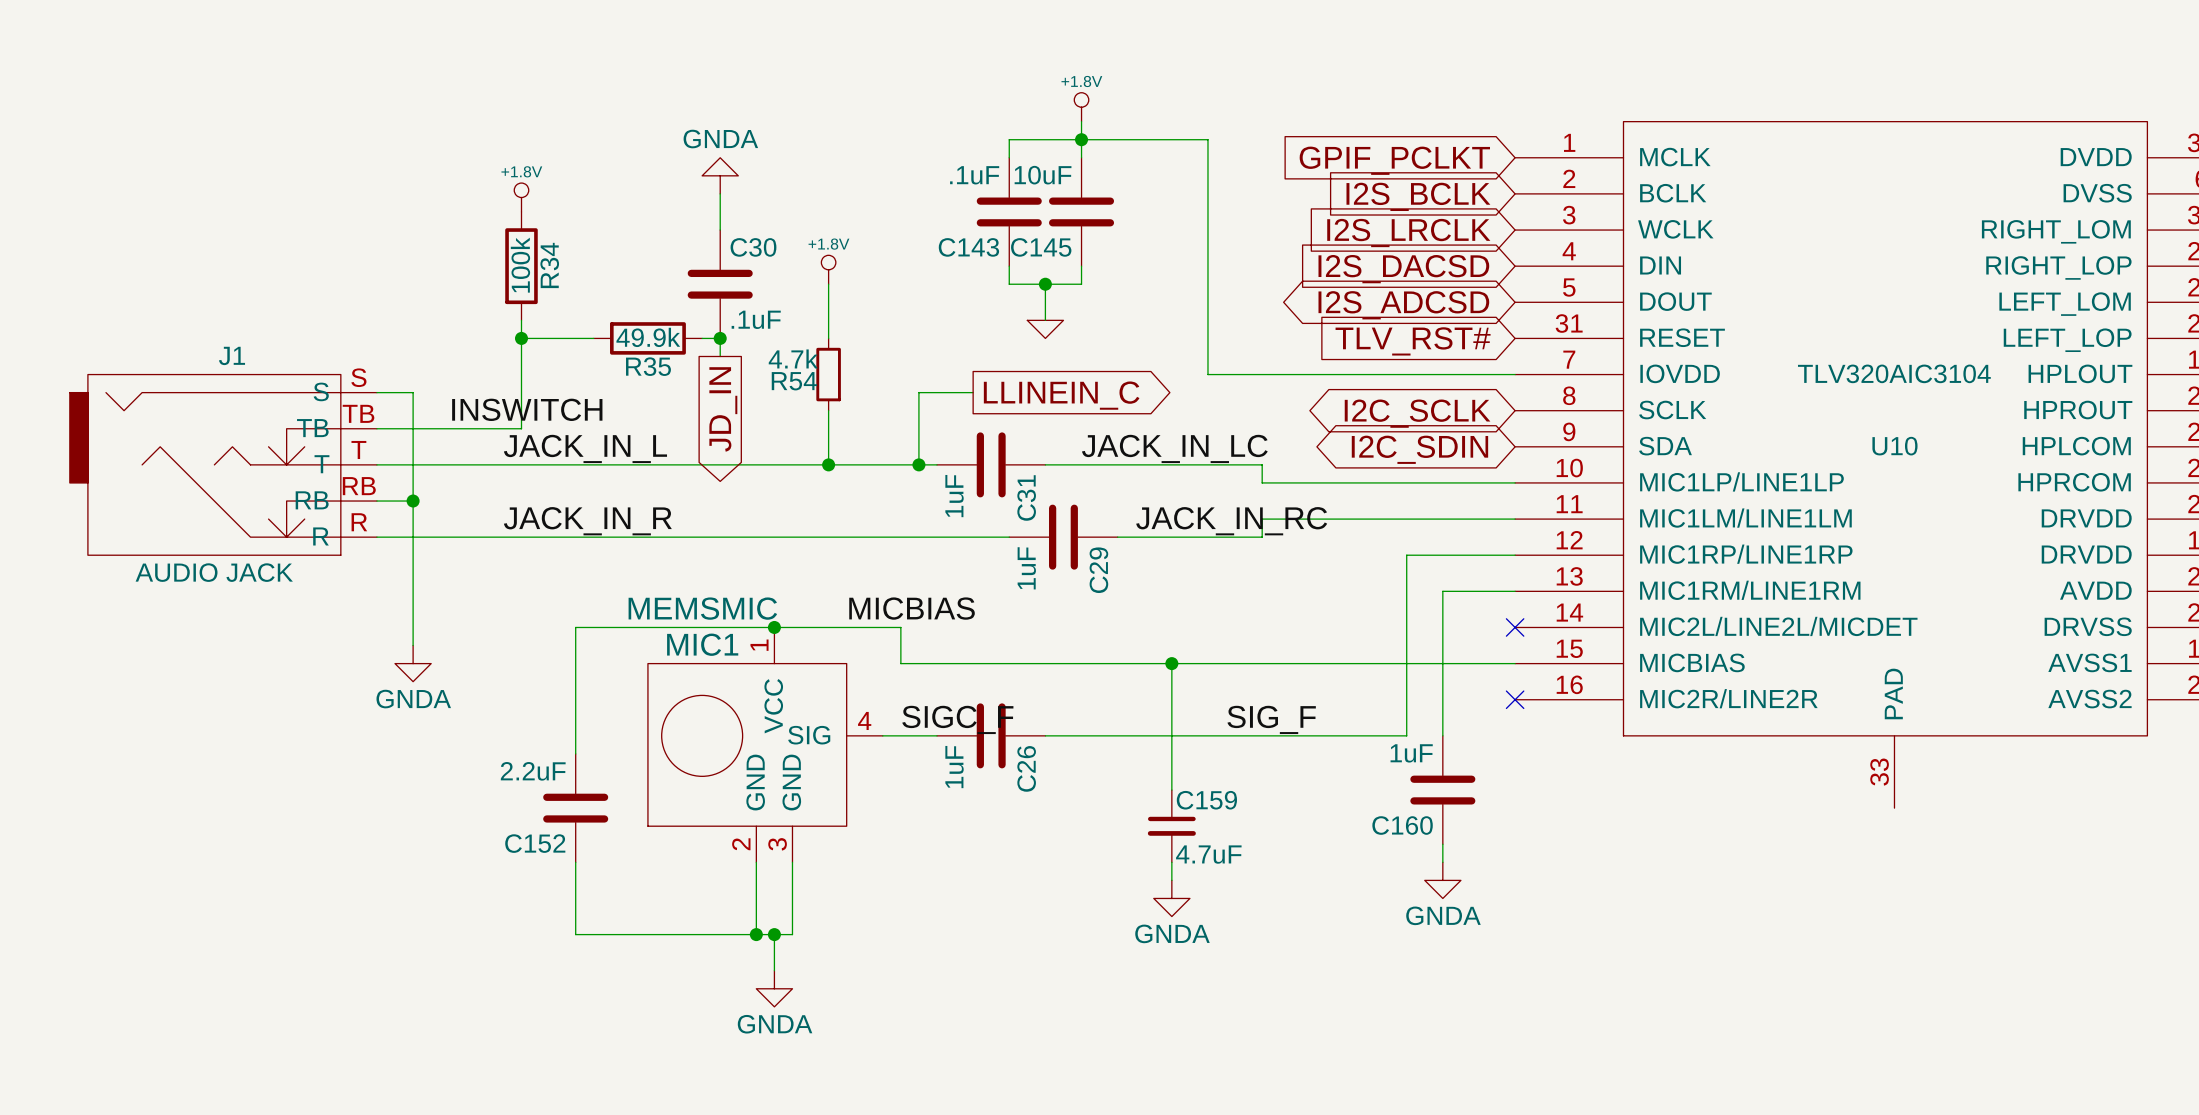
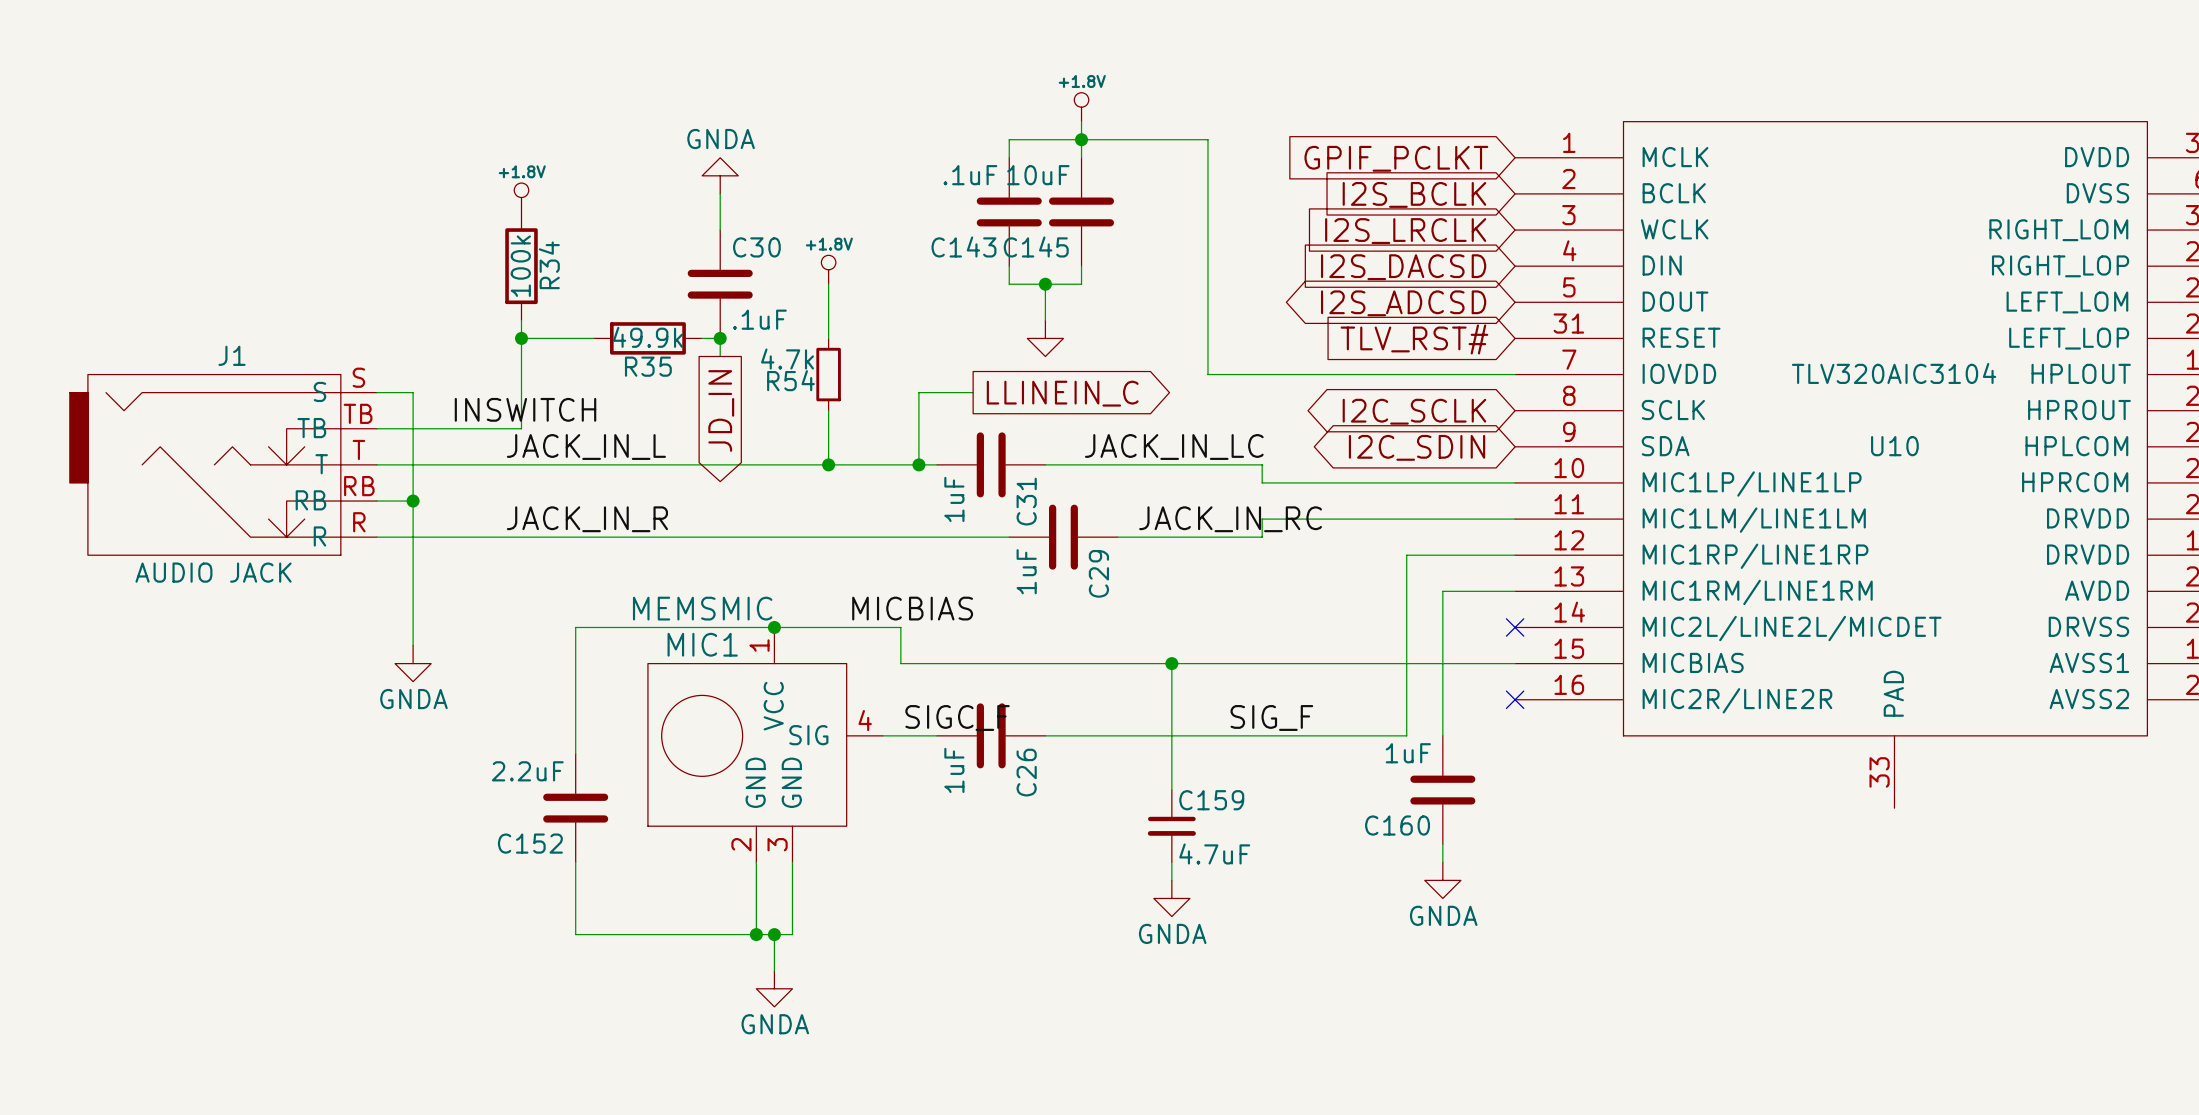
power symbol shape: [1027, 320, 1064, 339] -> [1027, 320, 1064, 357]

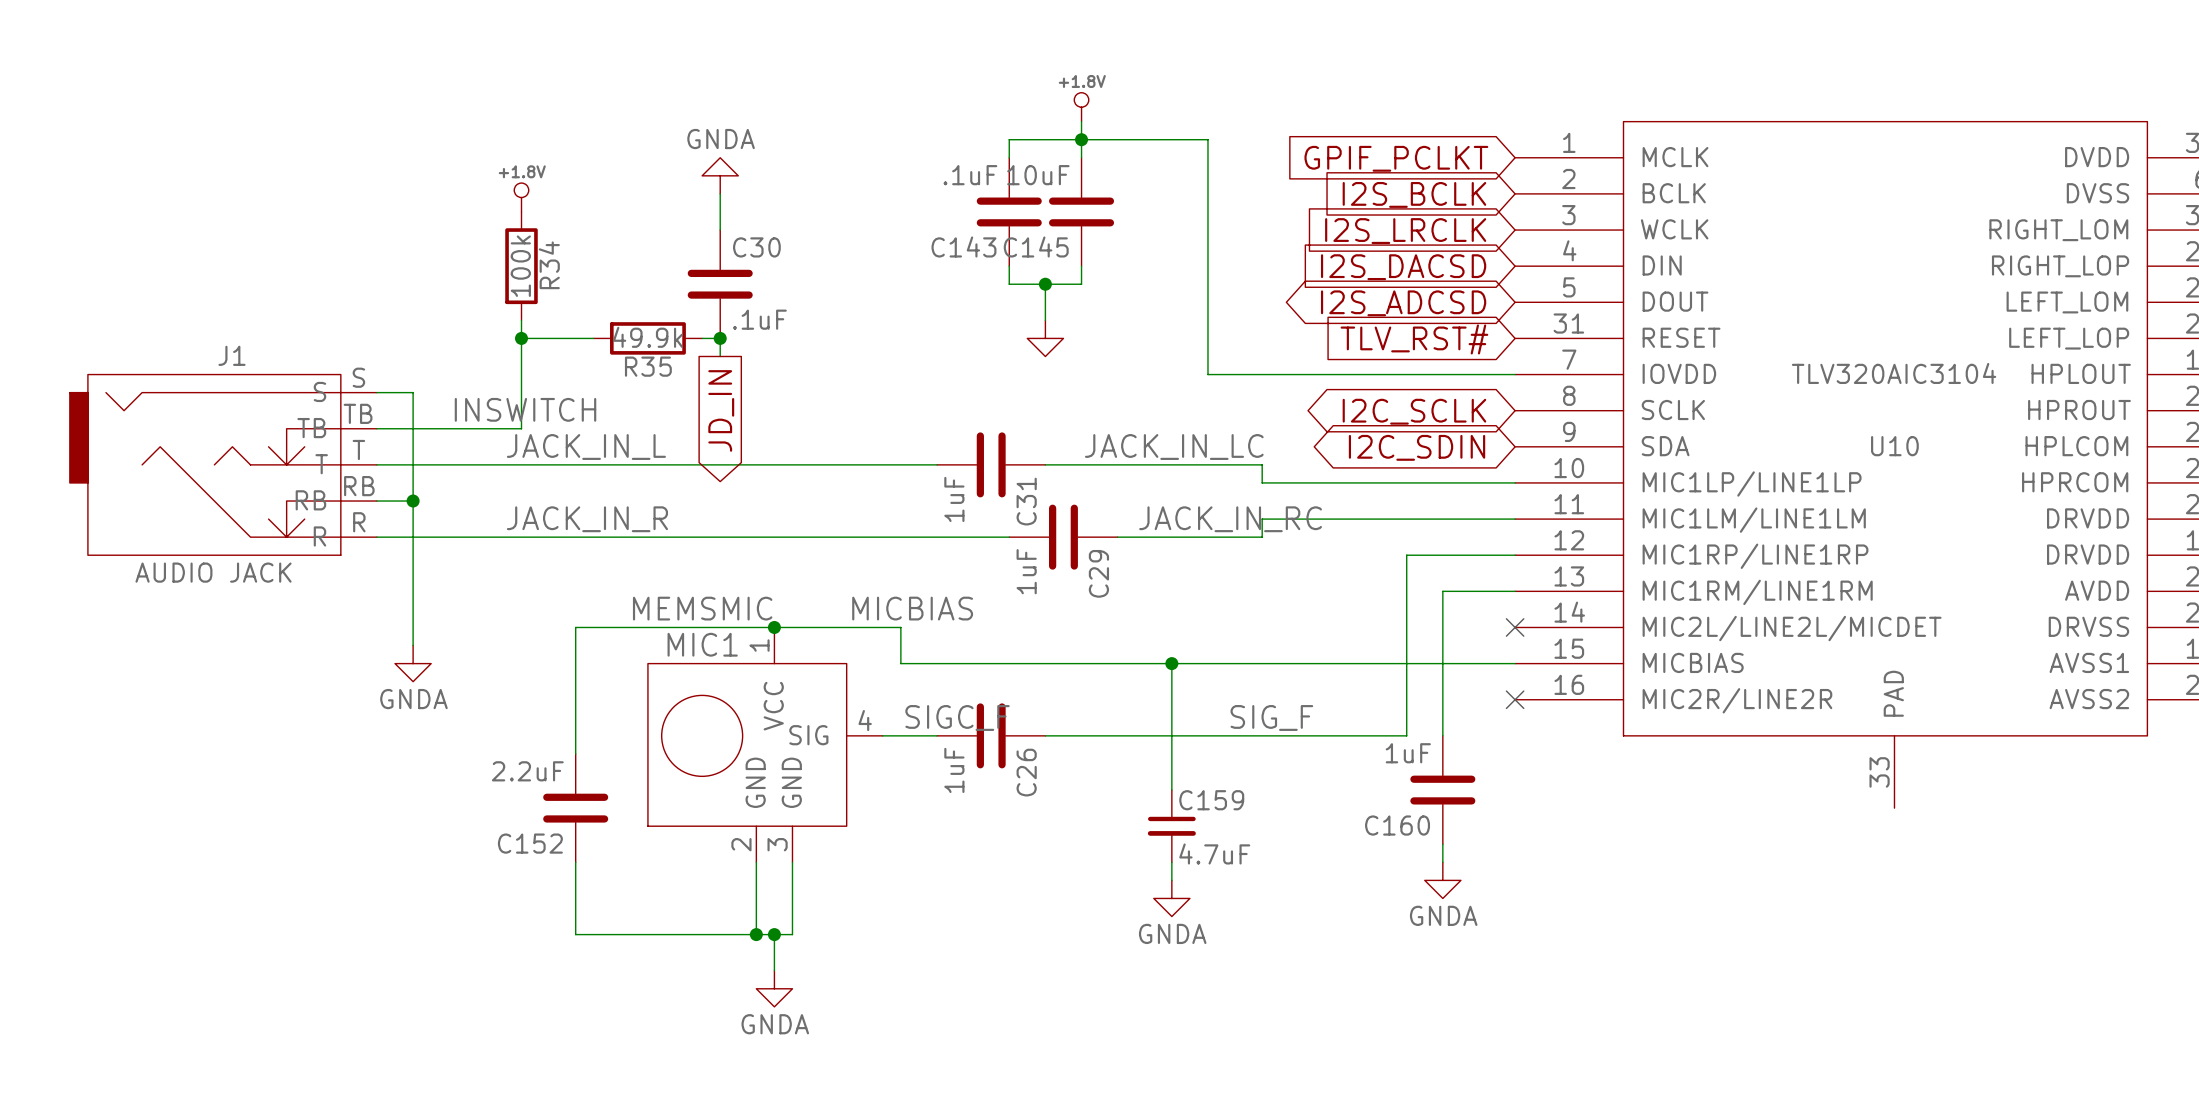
power symbol: +1.8V (828, 269) -> none
wire: (828, 284) (828, 338) -> none
R54: 4.7k (828, 374) -> none
wire: (973, 392) (918, 392) (918, 464) -> none
global label: LLINEIN_C (1062, 393) -> none
wire: (828, 410) (828, 464) -> none
junction: (828, 464) -> none
junction: (918, 464) -> none

